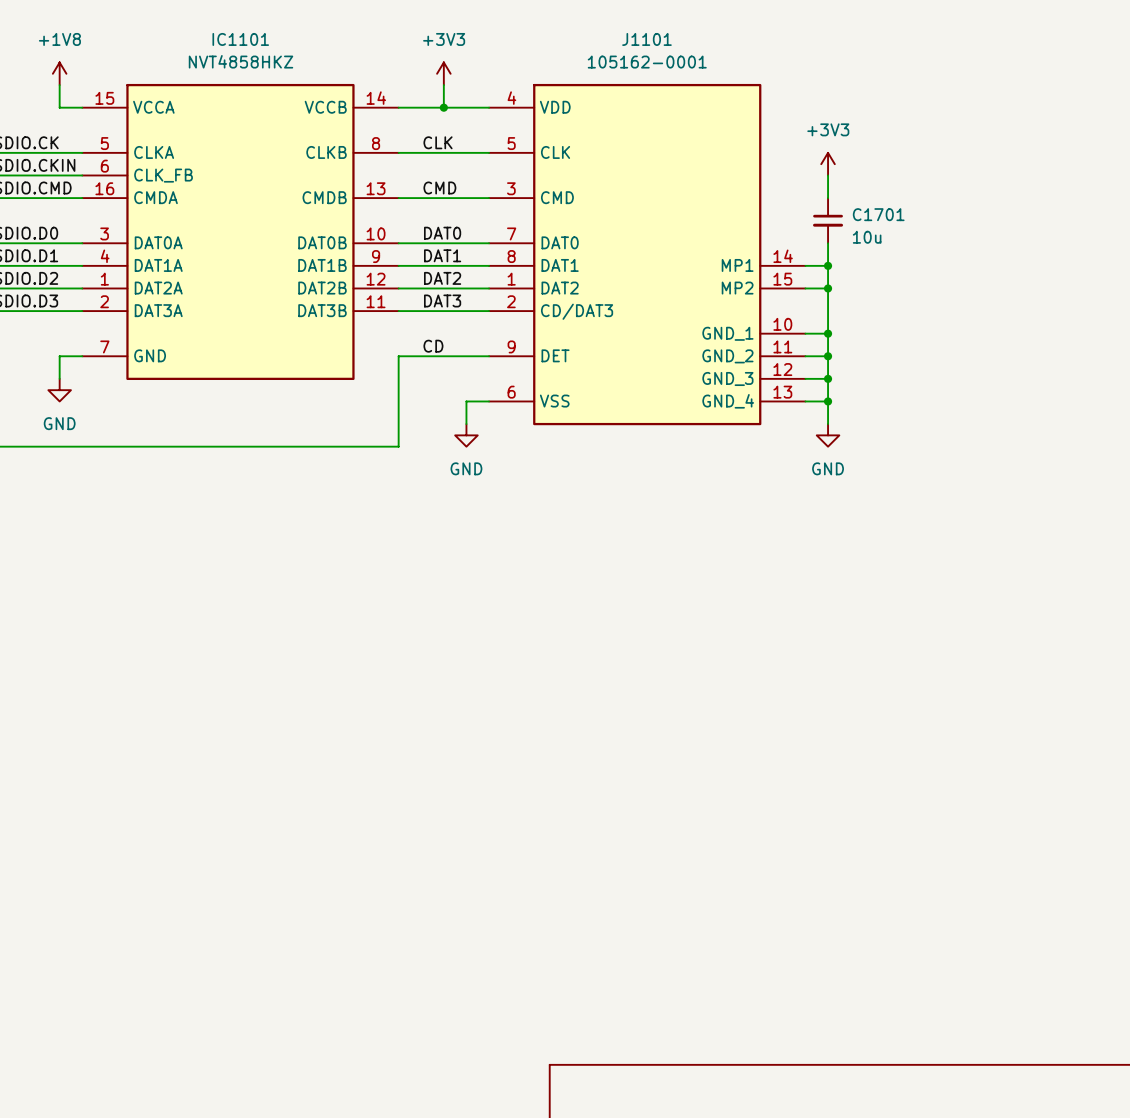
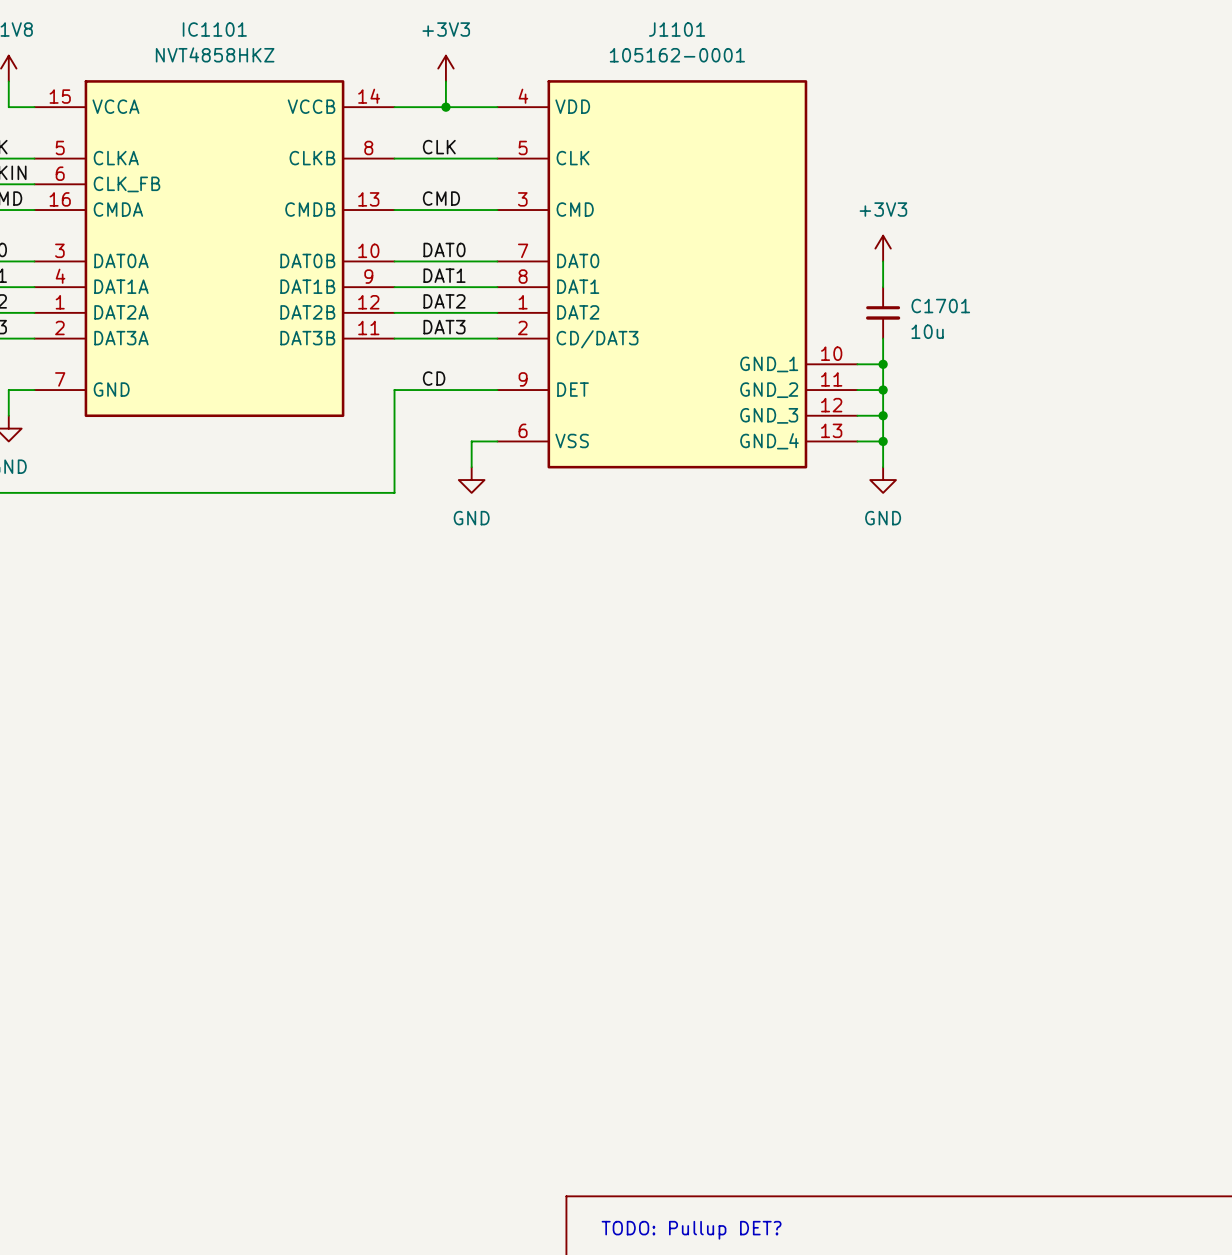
J1101 symbol: [489, 83, 806, 426] -> [497, 80, 858, 469]
power symbol position: +3V3 (828, 164) -> +3V3 (883, 248)
wire: (828, 175) (828, 198) -> none
C1701 position: (828, 220) -> (883, 312)
wire: (805, 265) (828, 265) (828, 311) -> none
junction: (828, 265) -> none
wire: (805, 288) (828, 288) -> none
junction: (828, 288) -> none
text: none -> TODO: Pullup DET? (691, 1230)

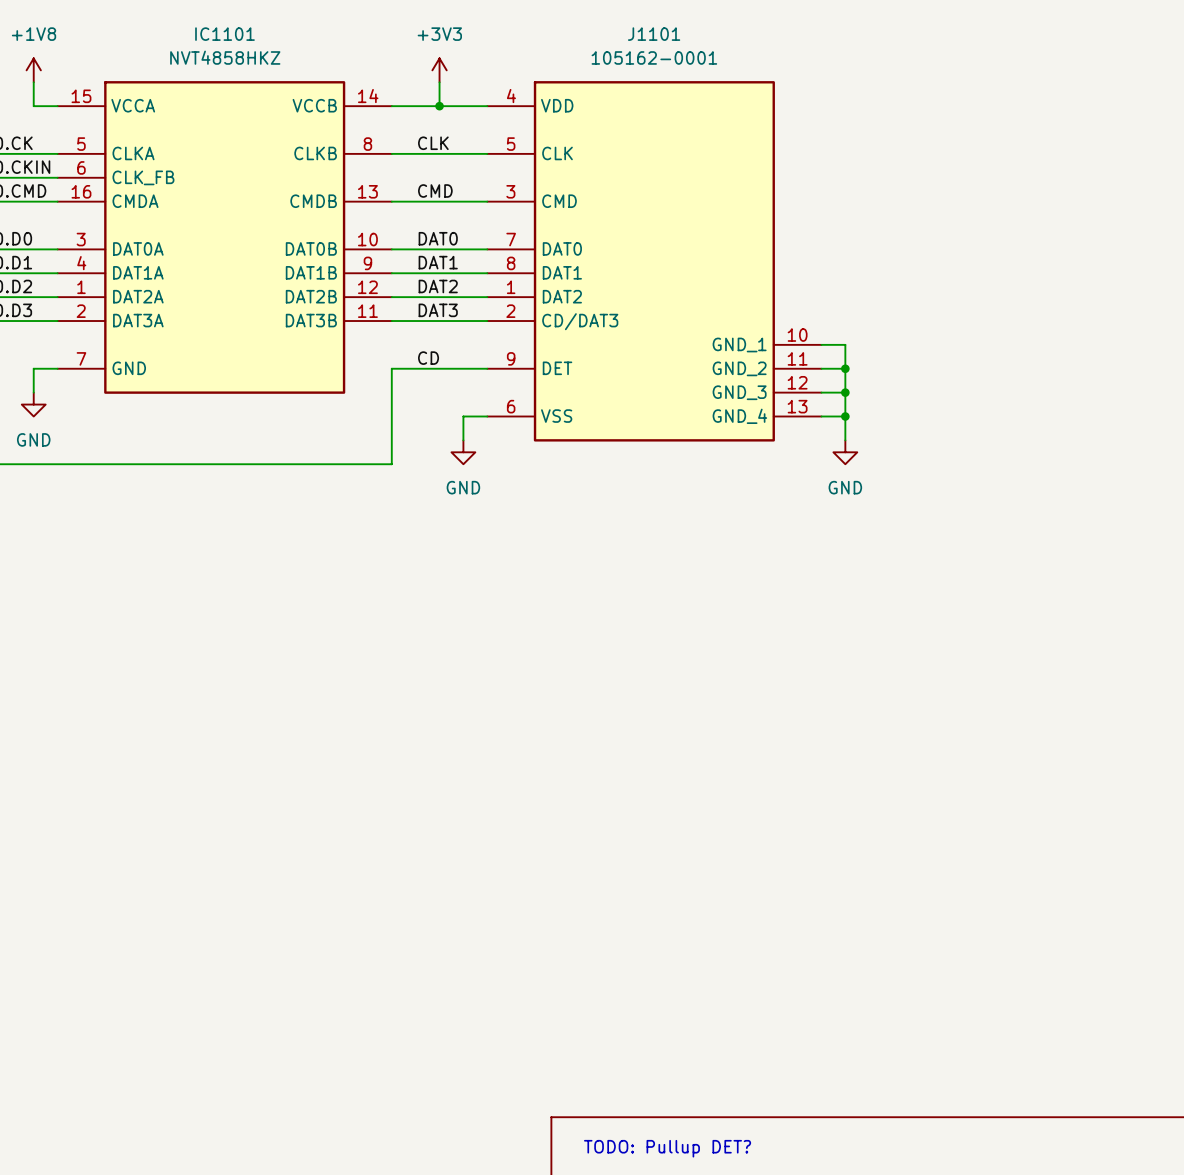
power symbol: +3V3 (883, 248) -> none
wire: (883, 261) (883, 287) -> none
C1701: 10u (883, 312) -> none
wire: (883, 338) (883, 364) -> none
junction: (883, 364) -> none

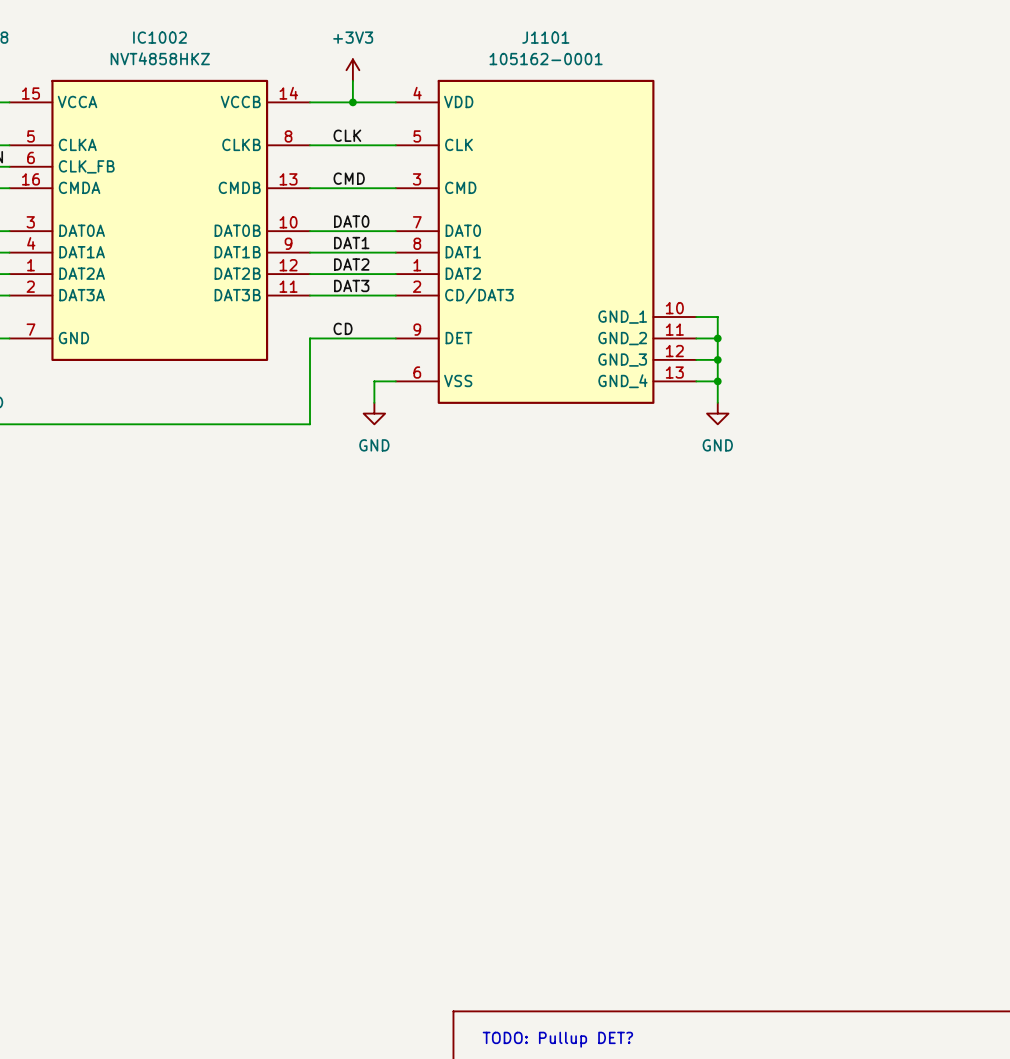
IC1101 name: IC1101 (224, 34) -> IC1002 (160, 37)

